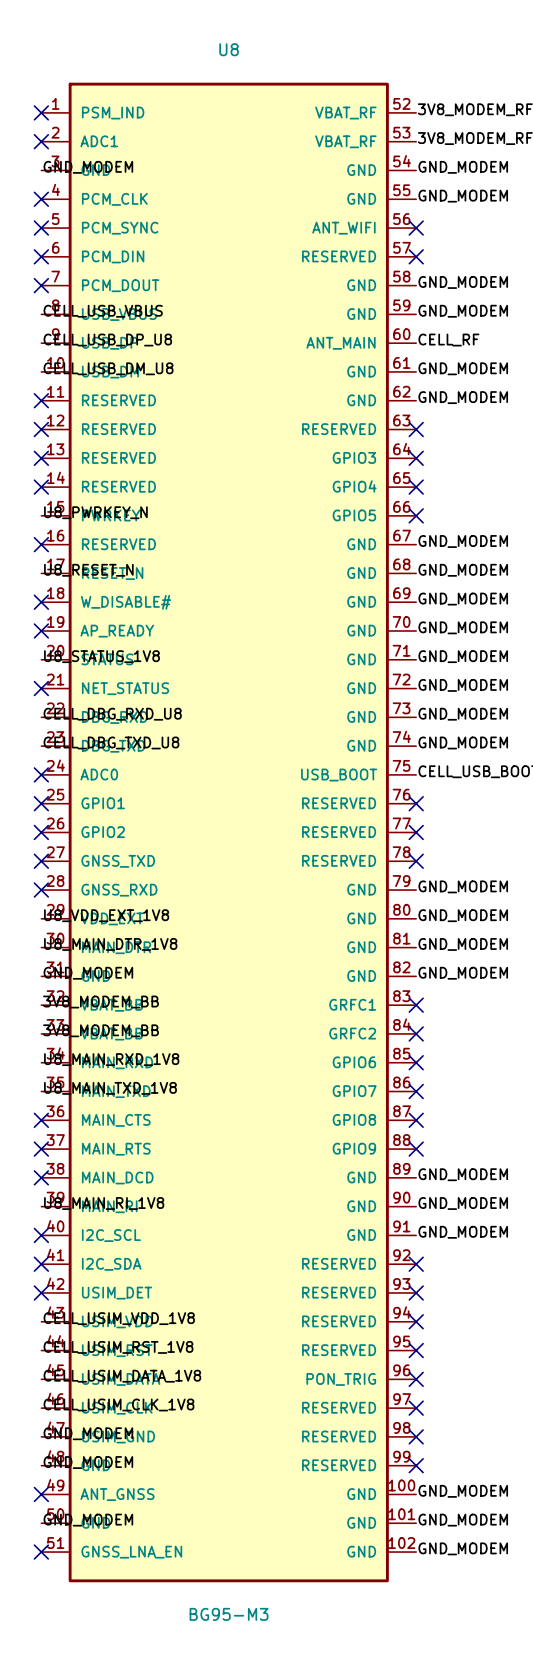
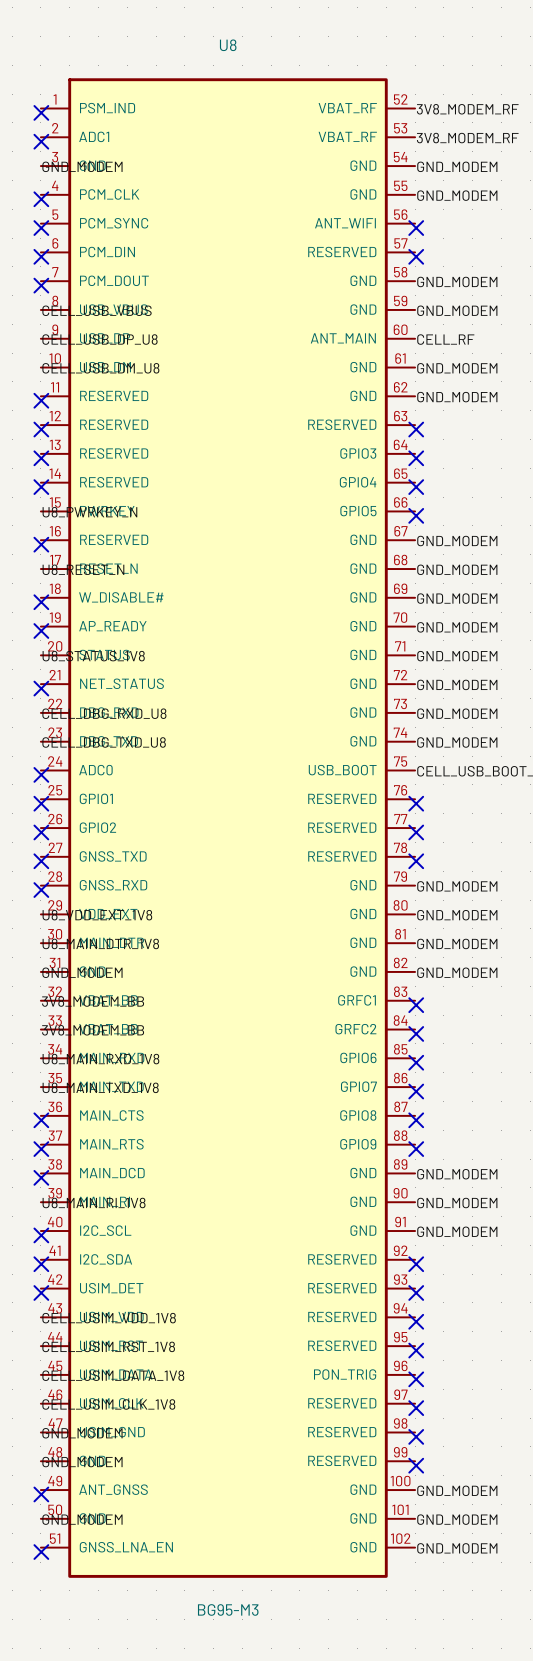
U8 symbol: [41, 82, 417, 1583] -> [40, 78, 416, 1578]

